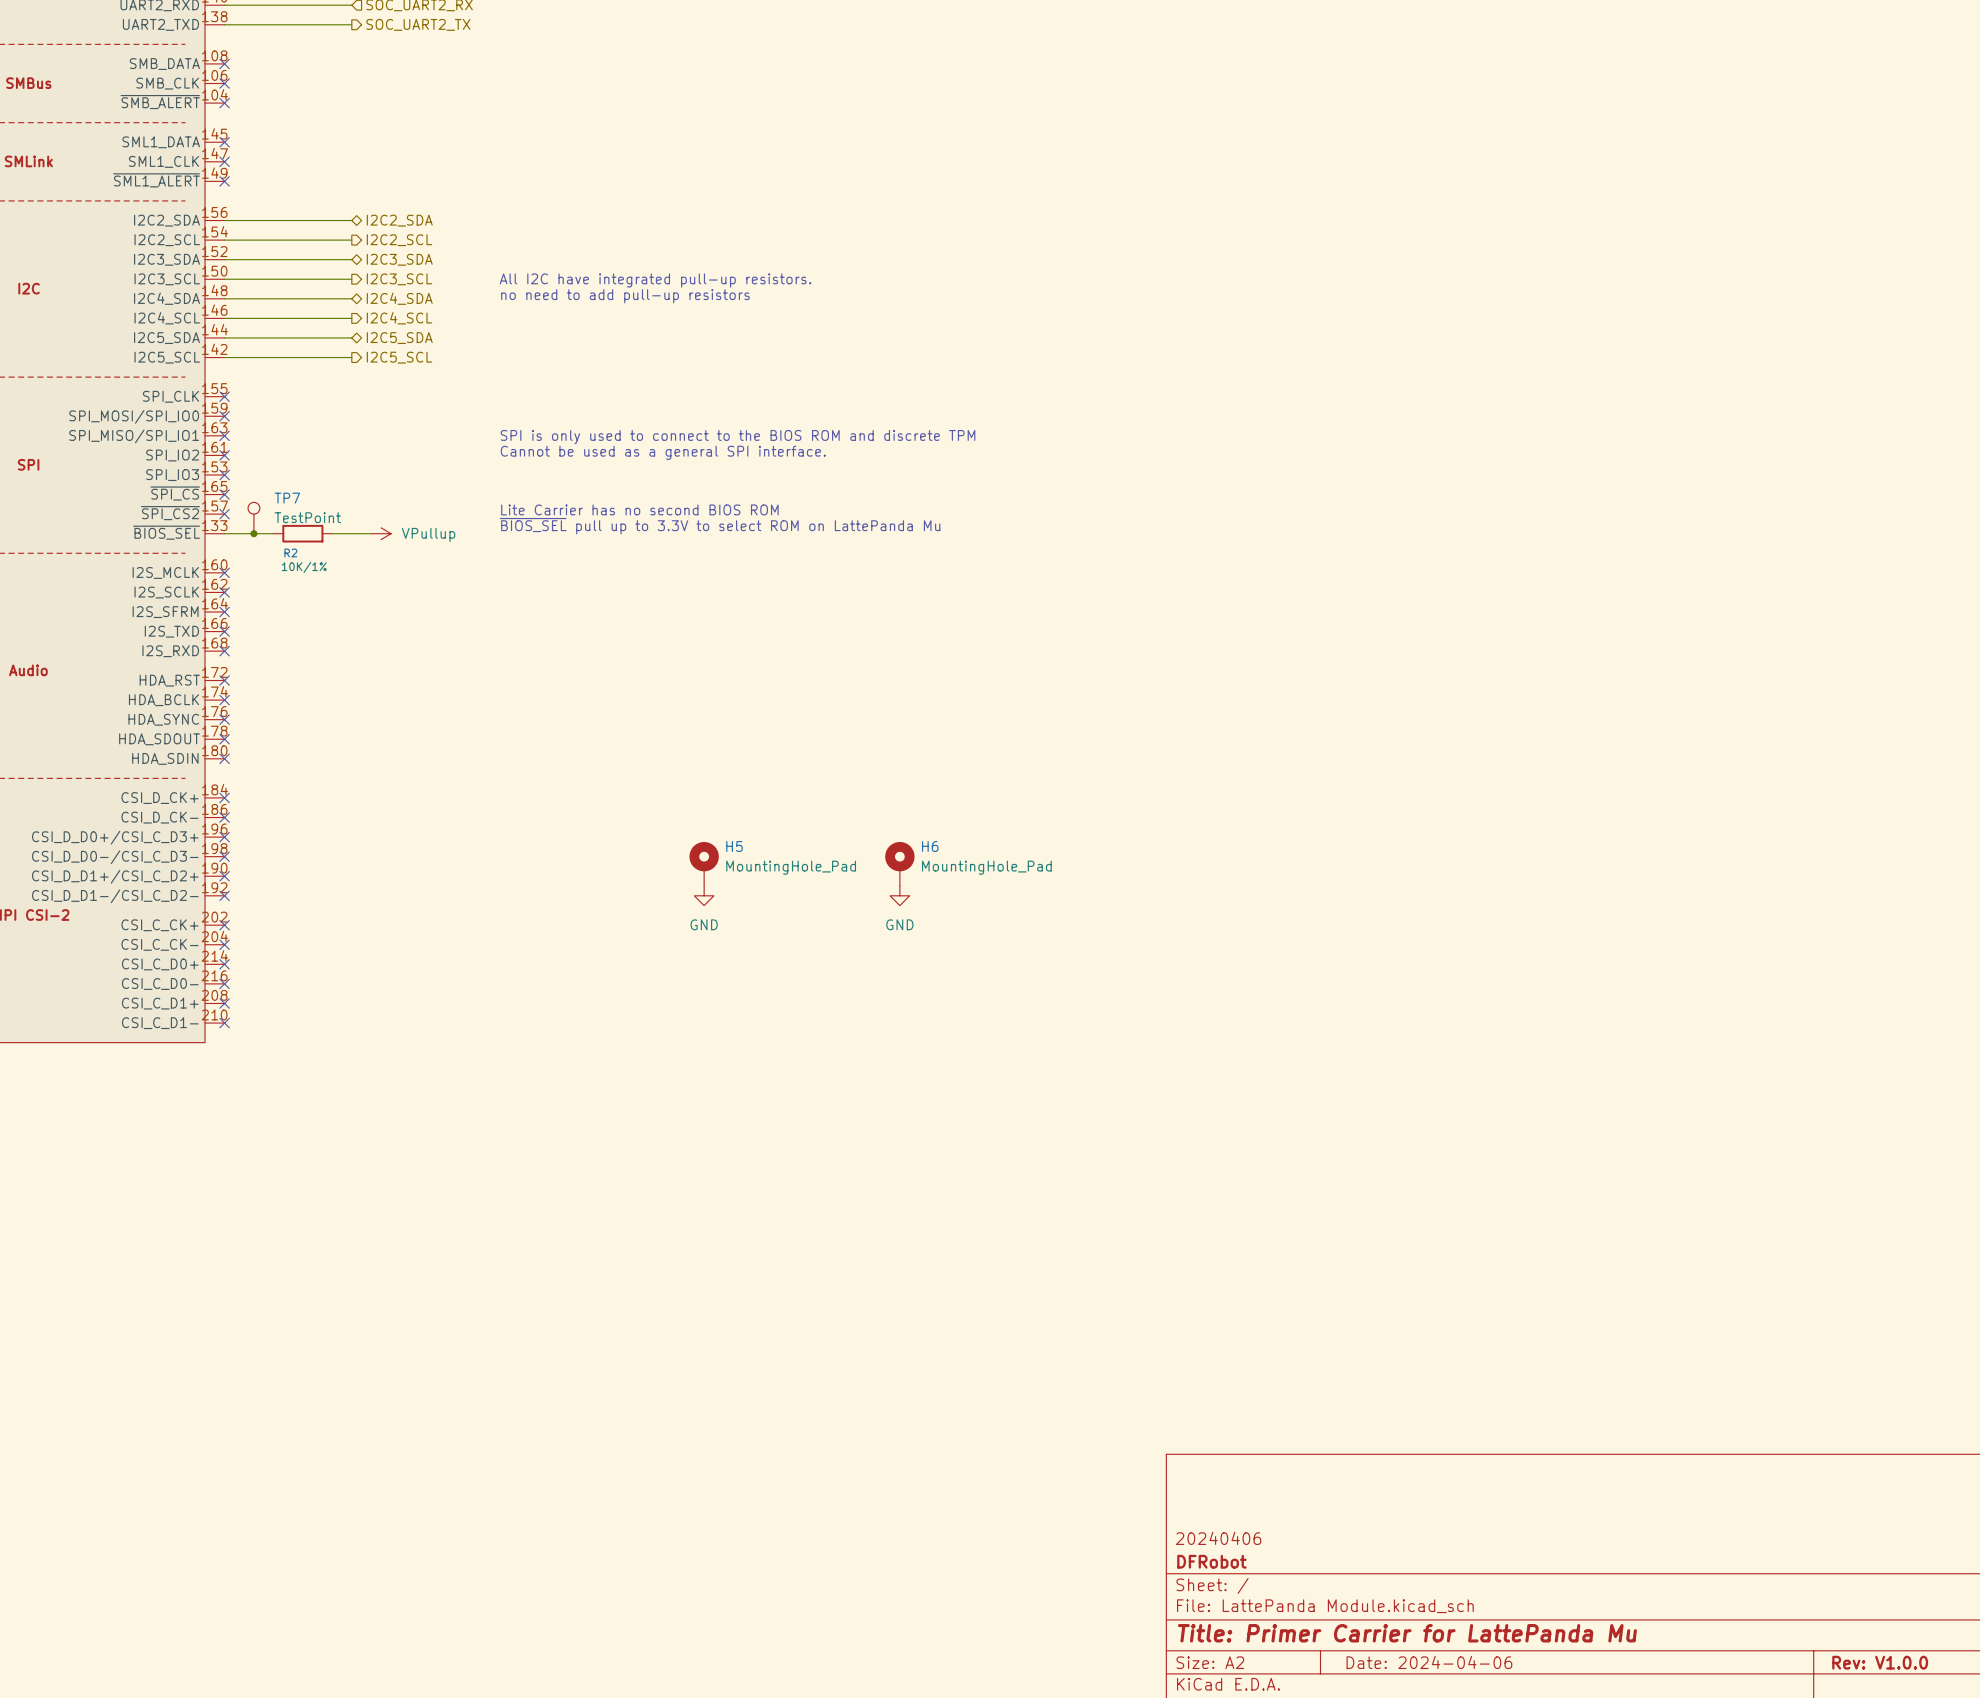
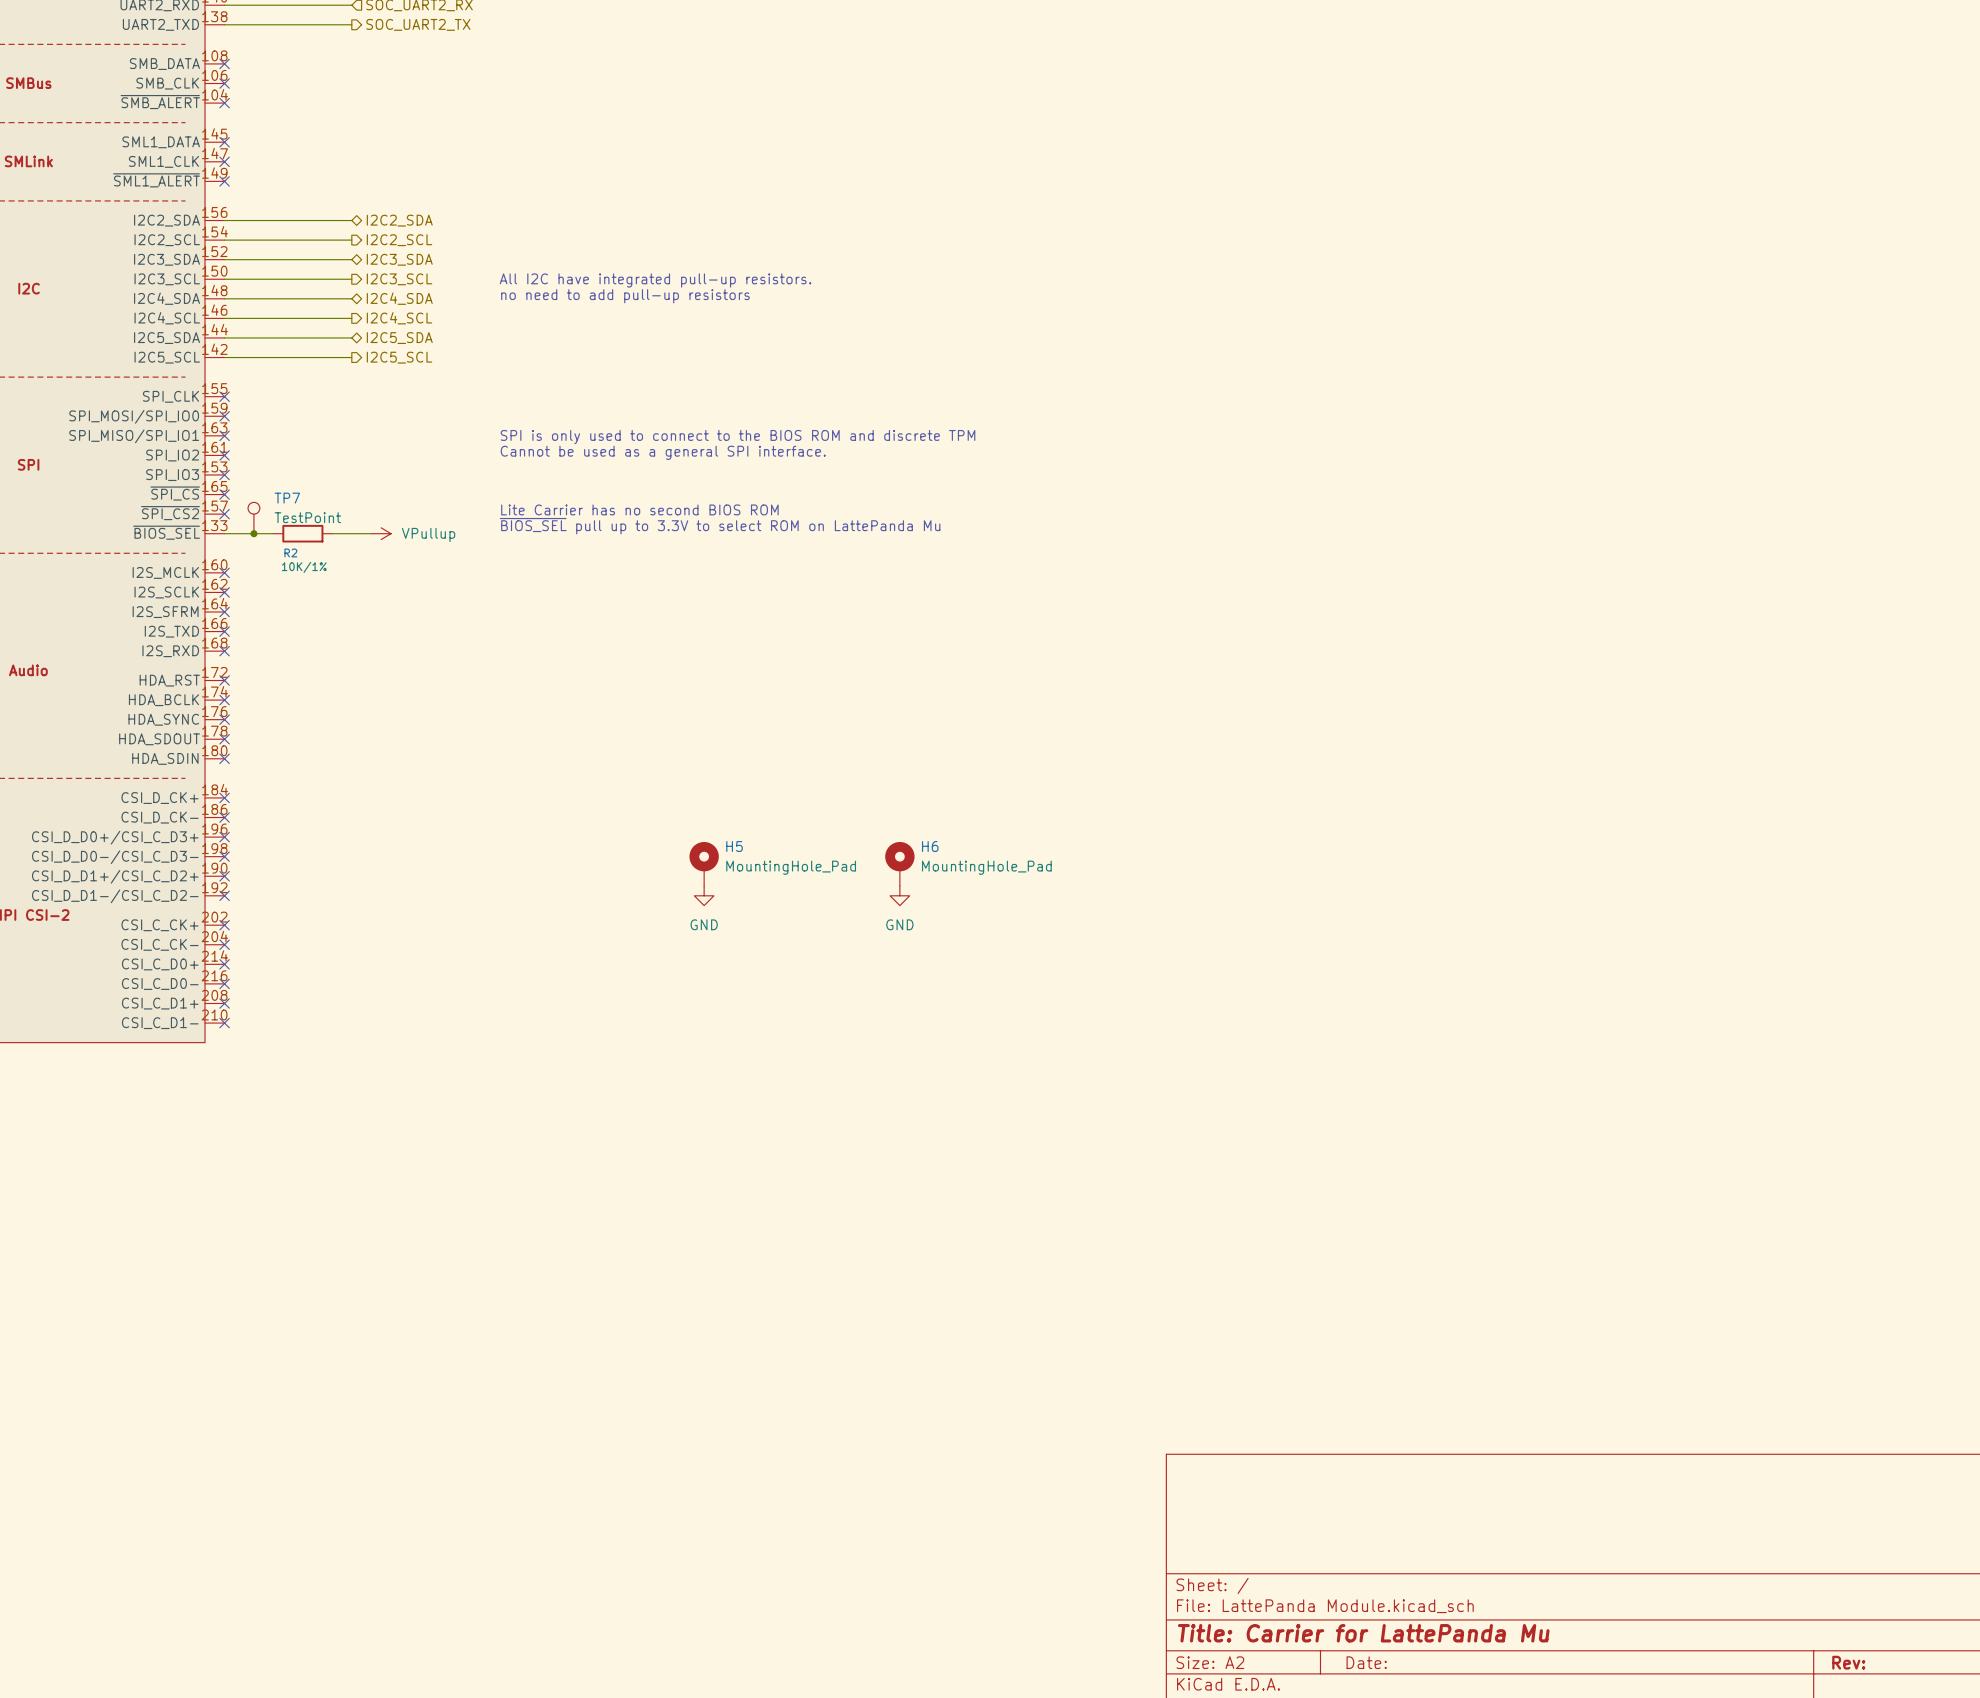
title block: 20240406 (1218, 1538) -> none
title block: DFRobot (1211, 1561) -> none
title block: Title: Primer Carrier for LattePanda Mu (1407, 1633) -> Title: Carrier for LattePanda Mu (1363, 1633)
title block: Date: 2024-04-06 (1429, 1662) -> Date: (1366, 1662)
title block: Rev: V1.0.0 (1880, 1662) -> Rev: (1848, 1662)

